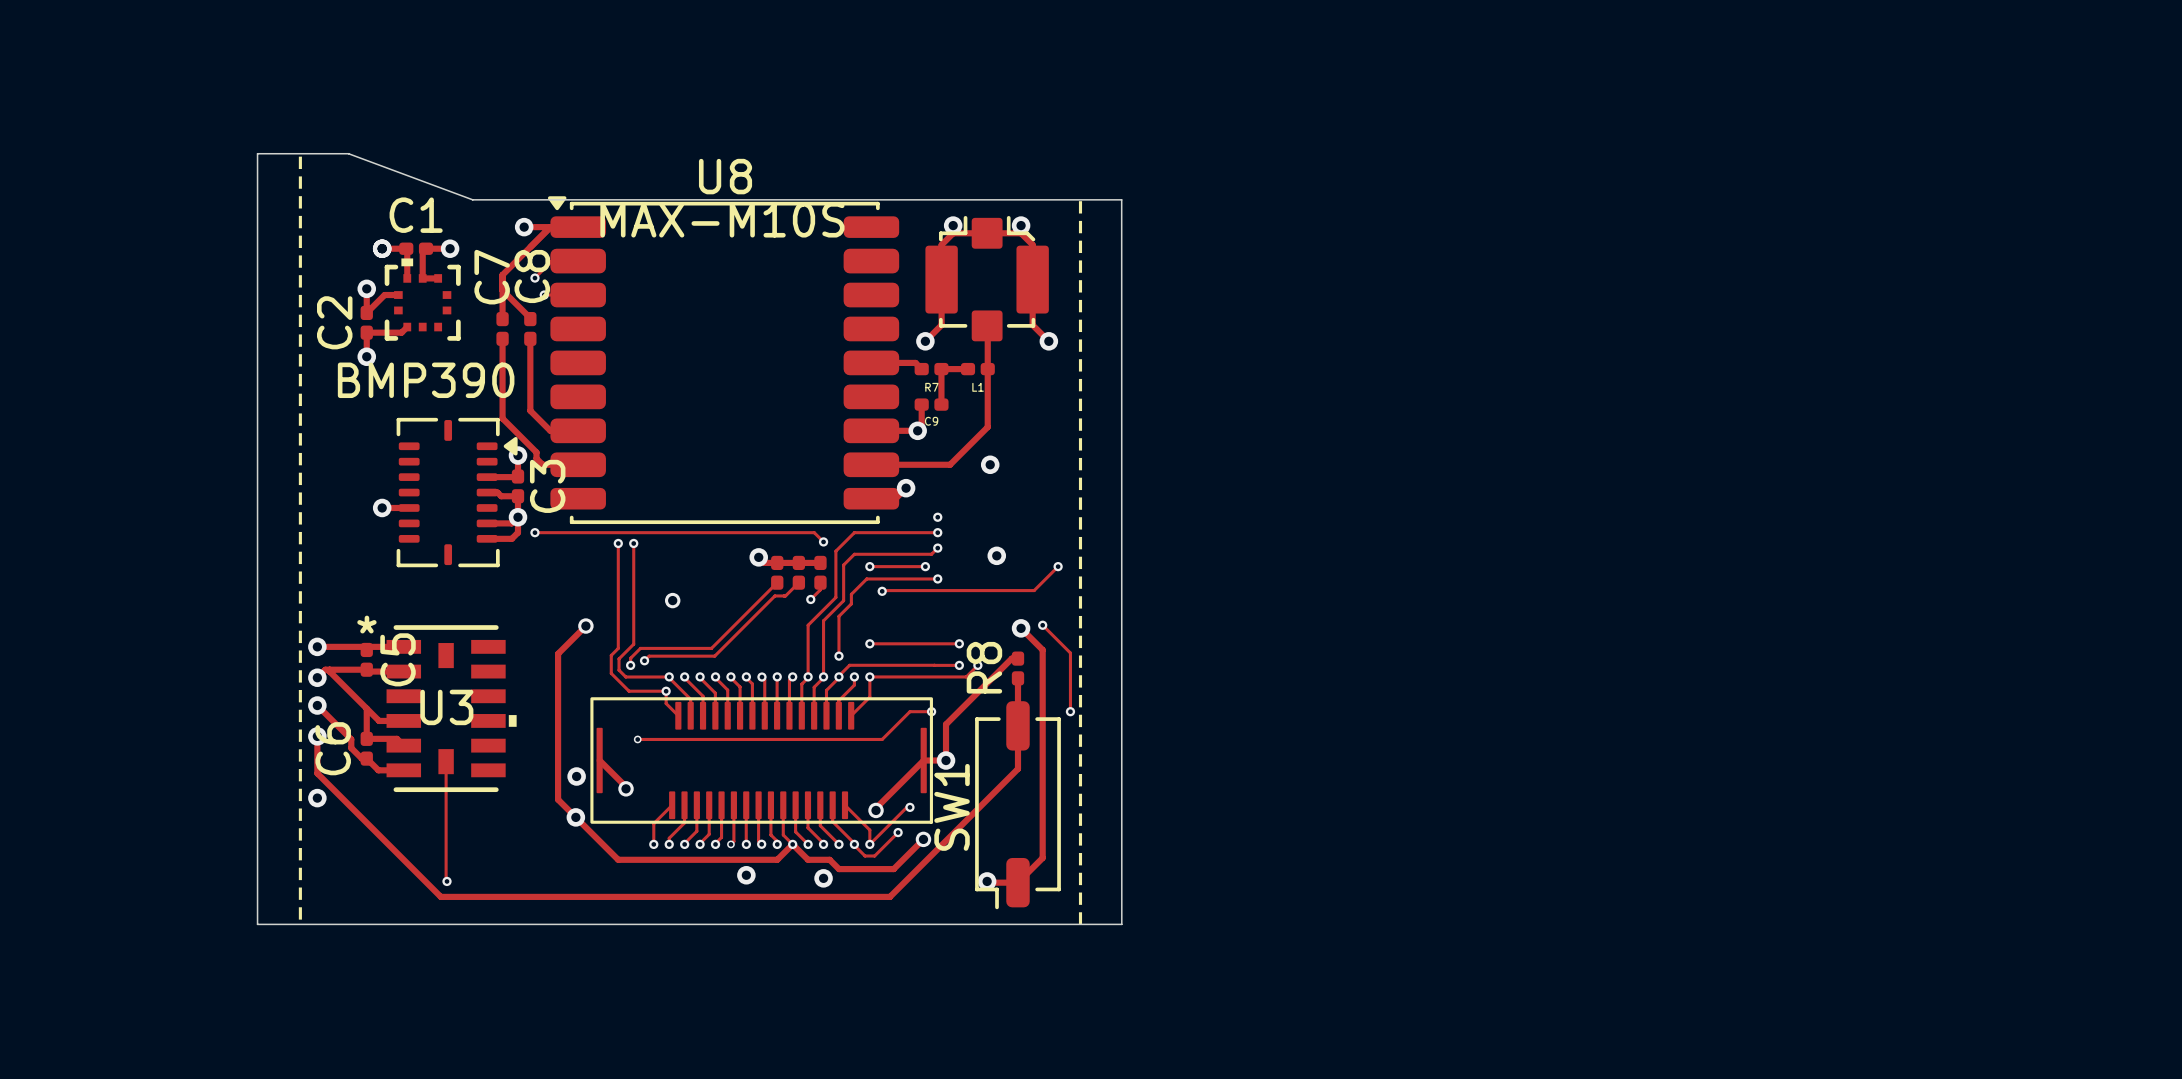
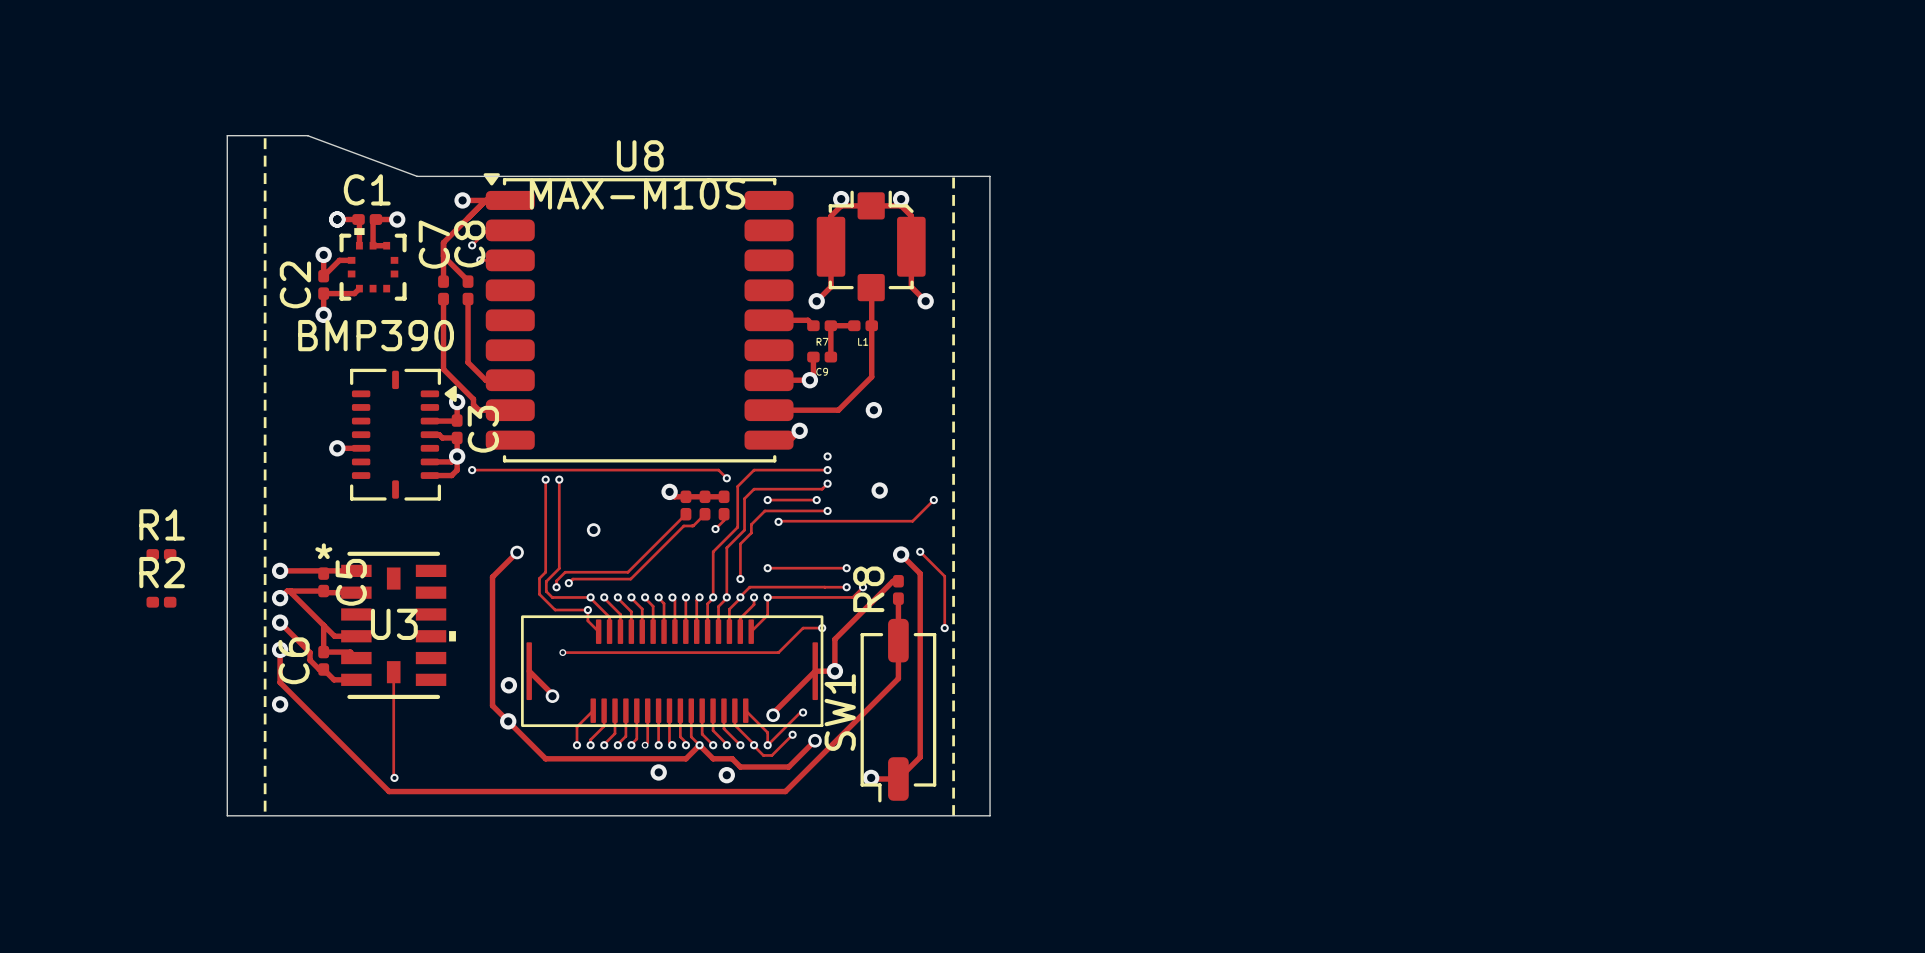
R1: none -> (161, 554)
R2: none -> (161, 602)

